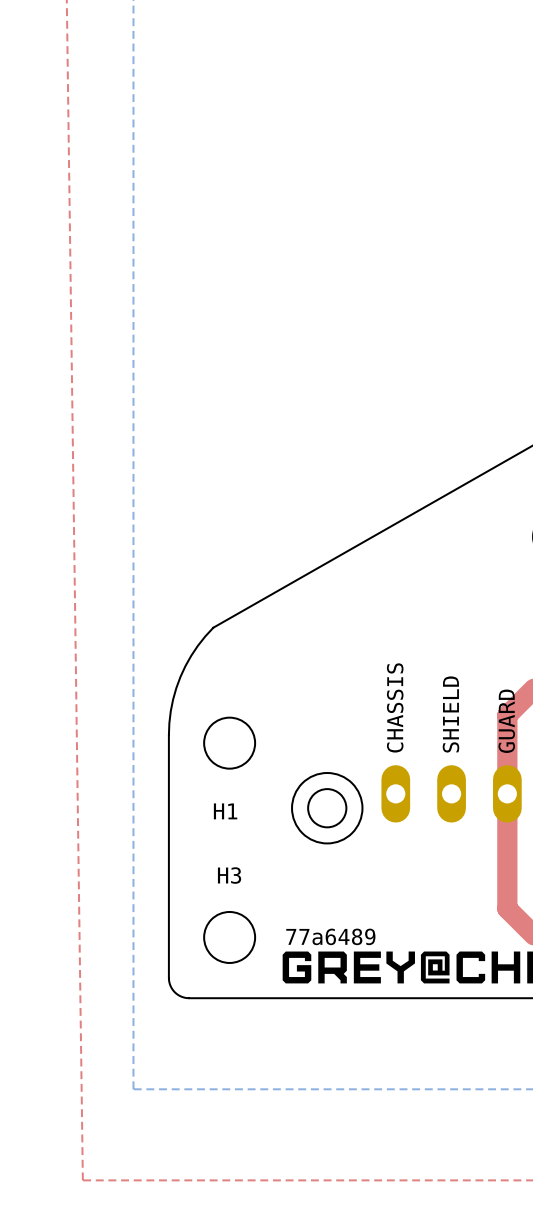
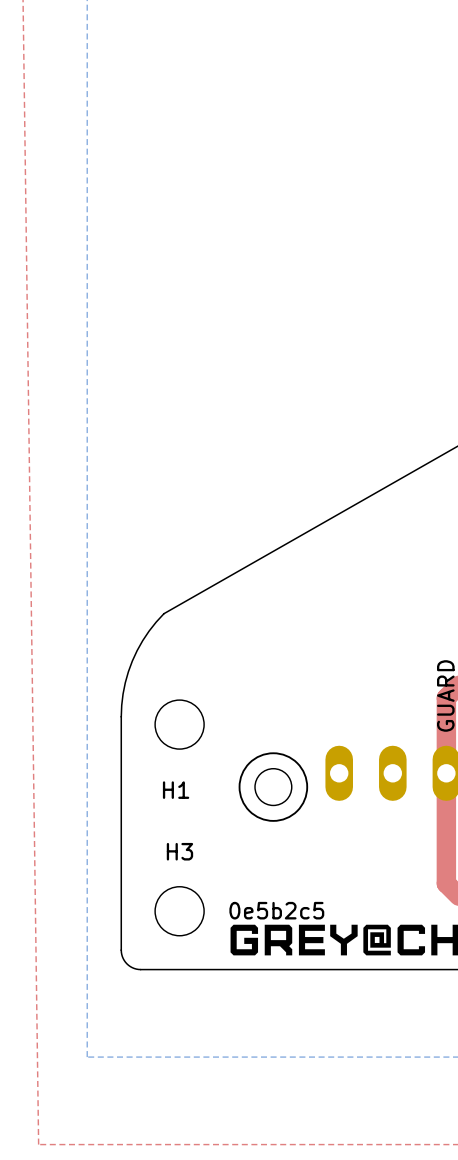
text: CHASSIS (395, 707) -> none
text: SHIELD (450, 714) -> none
text: 77a6489 (330, 936) -> 0e5b2c5 (276, 910)

